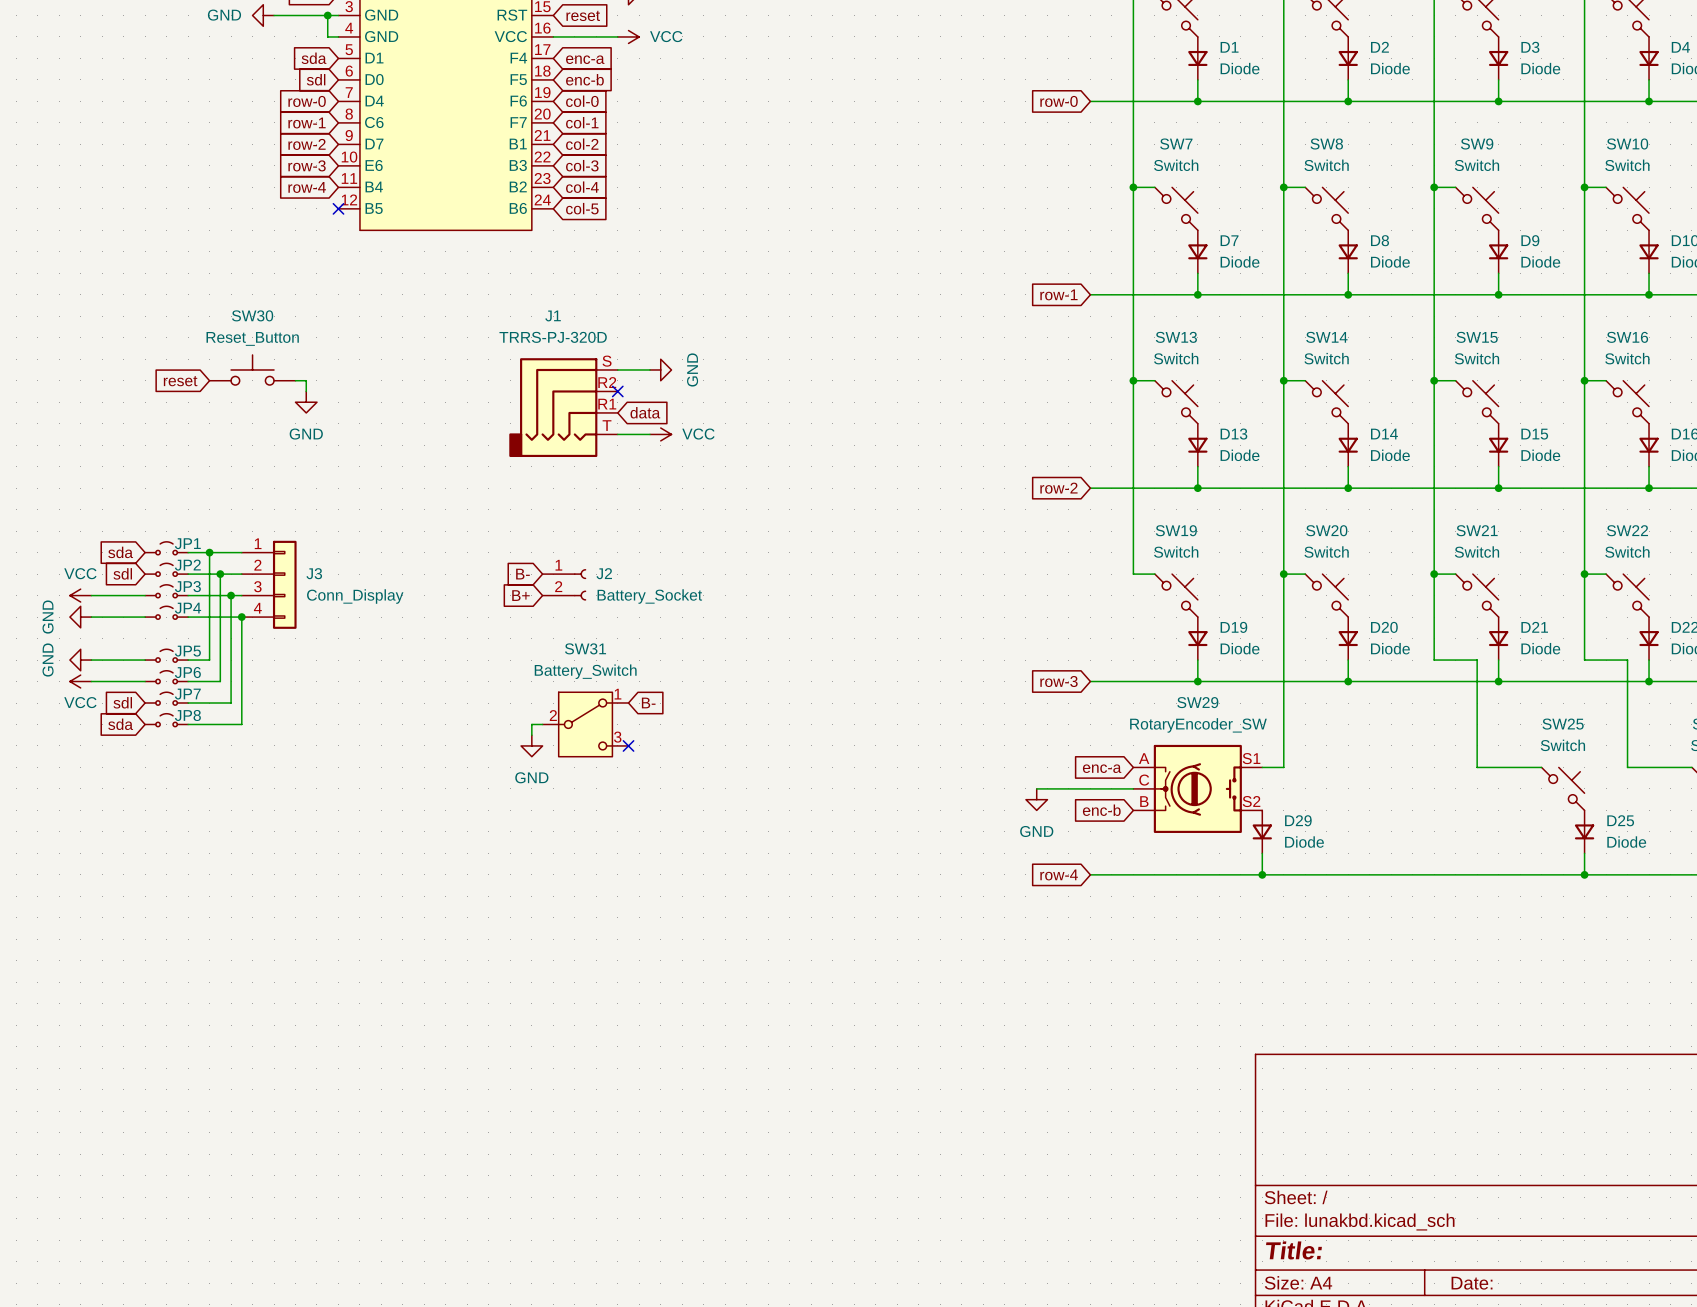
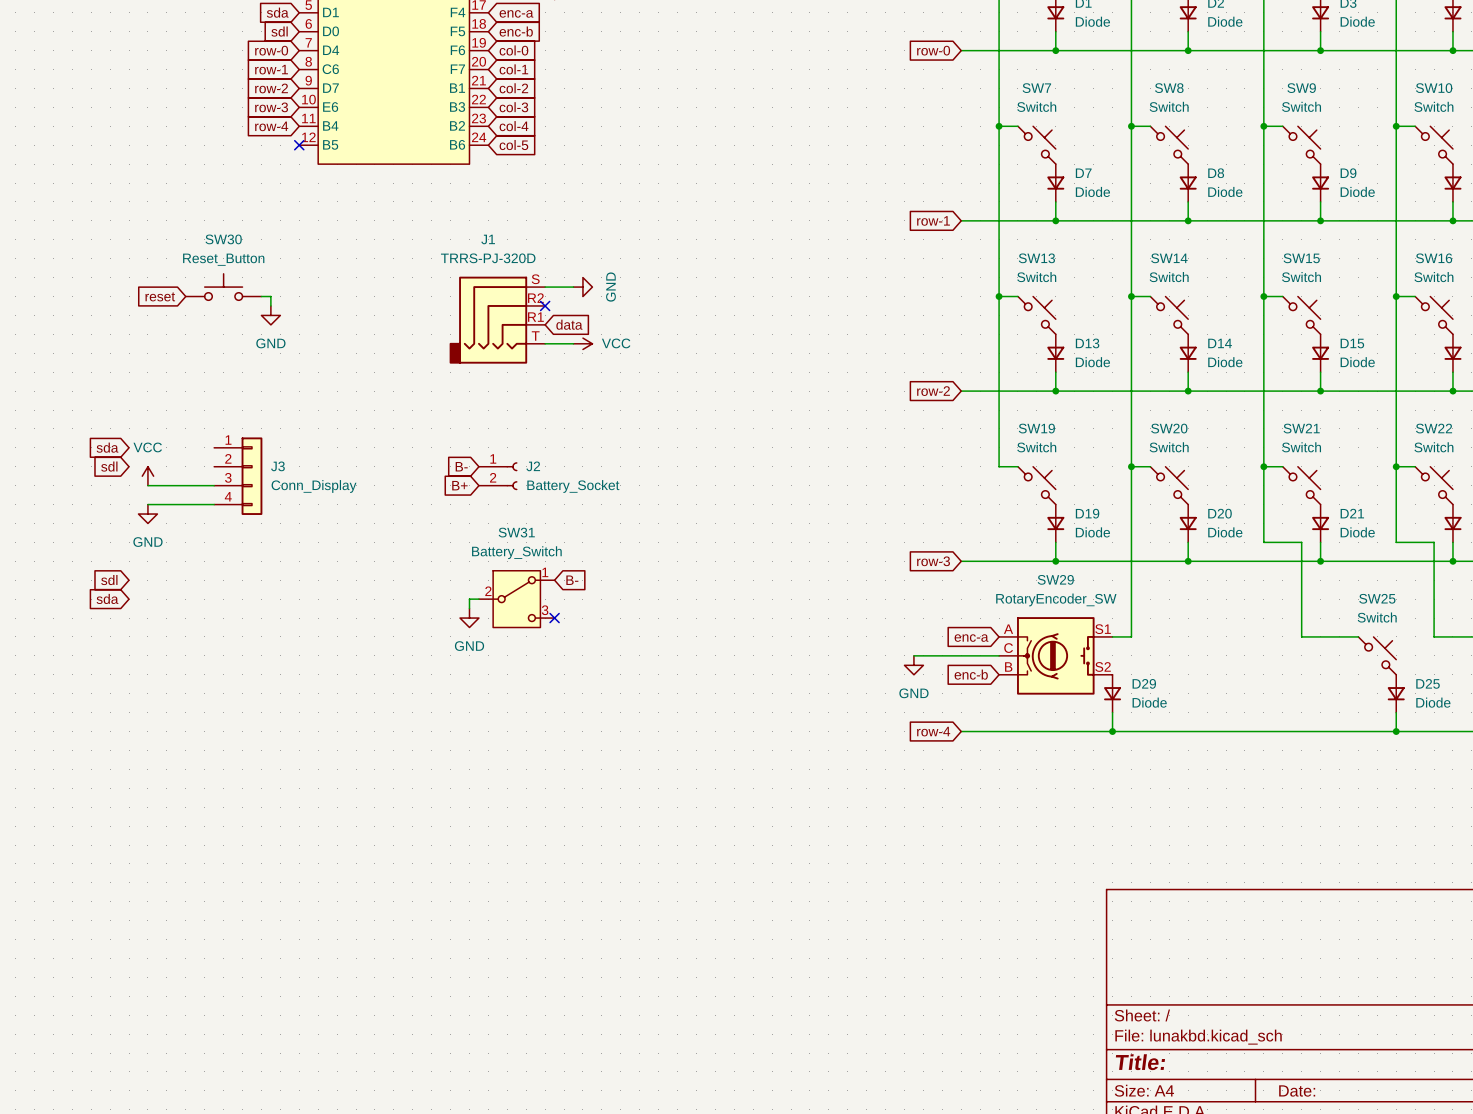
JP1: (166, 548) -> none
wire: (188, 552) (241, 552) -> none
wire: (209, 552) (209, 660) (188, 660) -> none
junction: (209, 552) -> none
JP2: (166, 569) -> none
wire: (188, 574) (241, 574) -> none
wire: (220, 574) (220, 681) (188, 681) -> none
junction: (220, 574) -> none
power symbol: none -> VCC (147, 476)
JP3: (166, 591) -> none
power symbol: VCC (80, 595) -> none
wire: (91, 595) (145, 595) -> none
wire: (231, 595) (231, 703) (188, 703) -> none
junction: (231, 595) -> none
JP4: (166, 612) -> none
power symbol: GND (80, 617) -> none
wire: (91, 617) (145, 617) -> none
wire: (241, 617) (241, 724) (188, 724) -> none
junction: (241, 617) -> none
power symbol: none -> GND (147, 514)
JP5: (166, 655) -> none
power symbol: GND (80, 660) -> none
wire: (91, 660) (145, 660) -> none
JP6: (166, 677) -> none
power symbol: VCC (80, 681) -> none
wire: (91, 681) (145, 681) -> none
JP7: (166, 698) -> none
JP8: (166, 720) -> none

